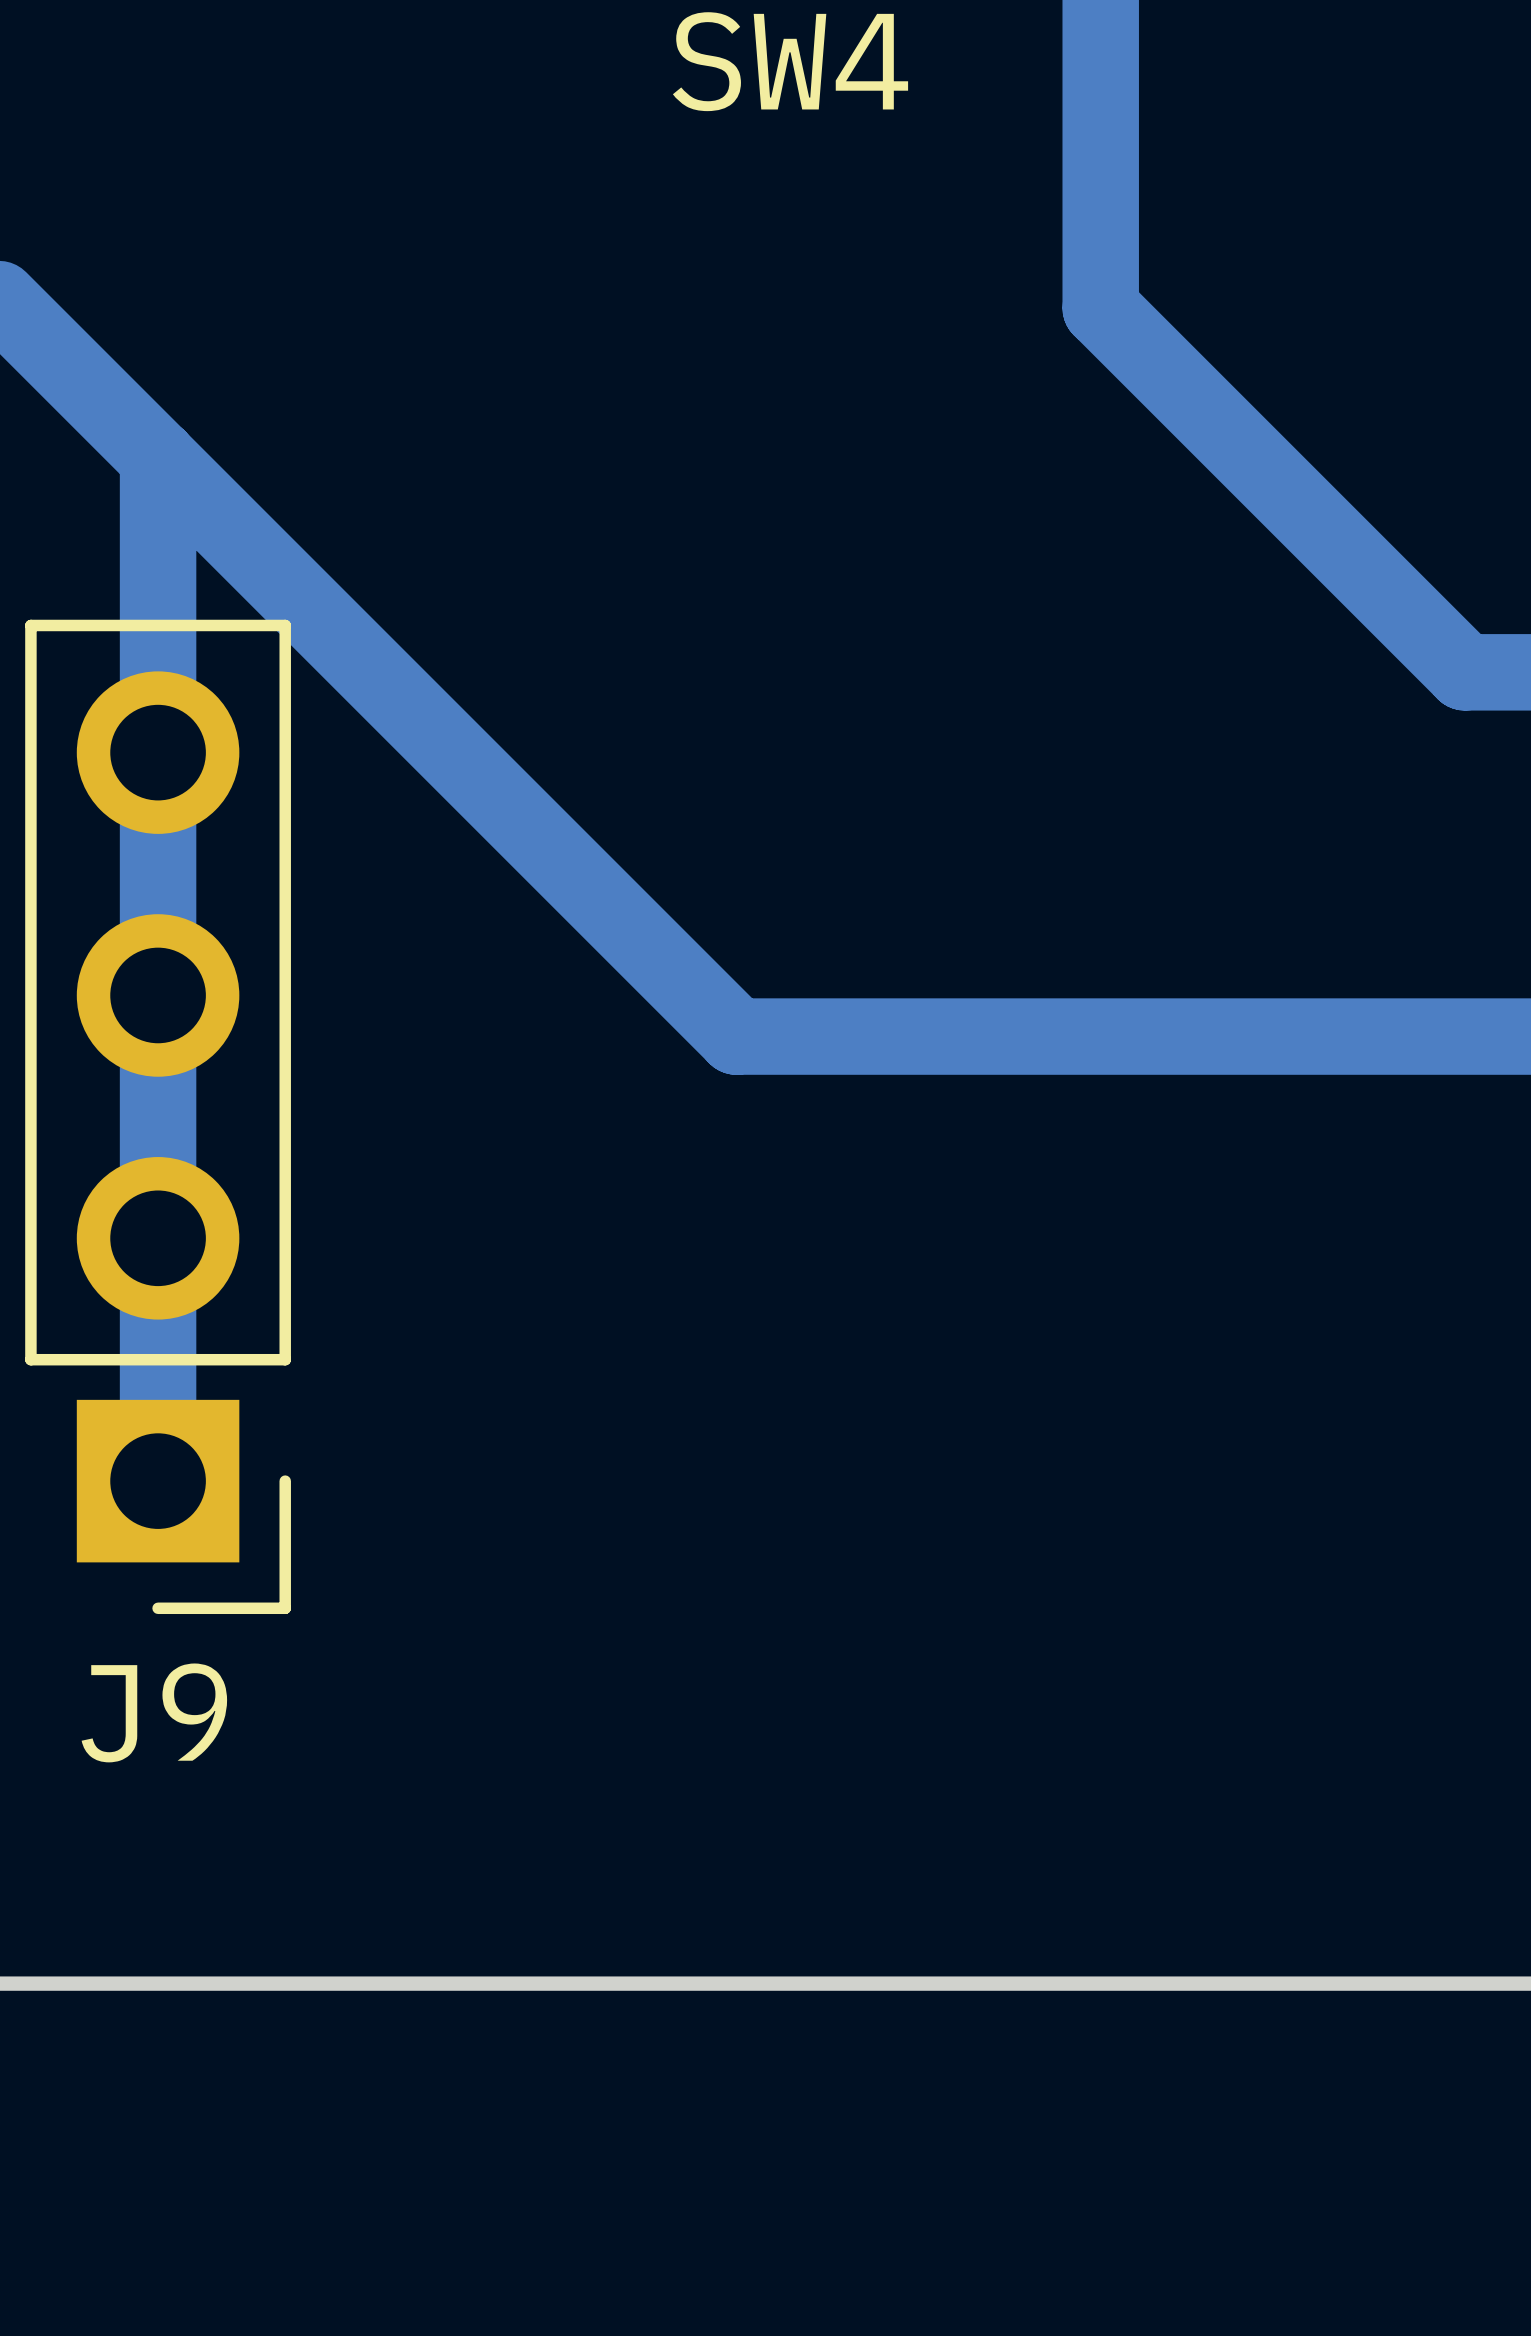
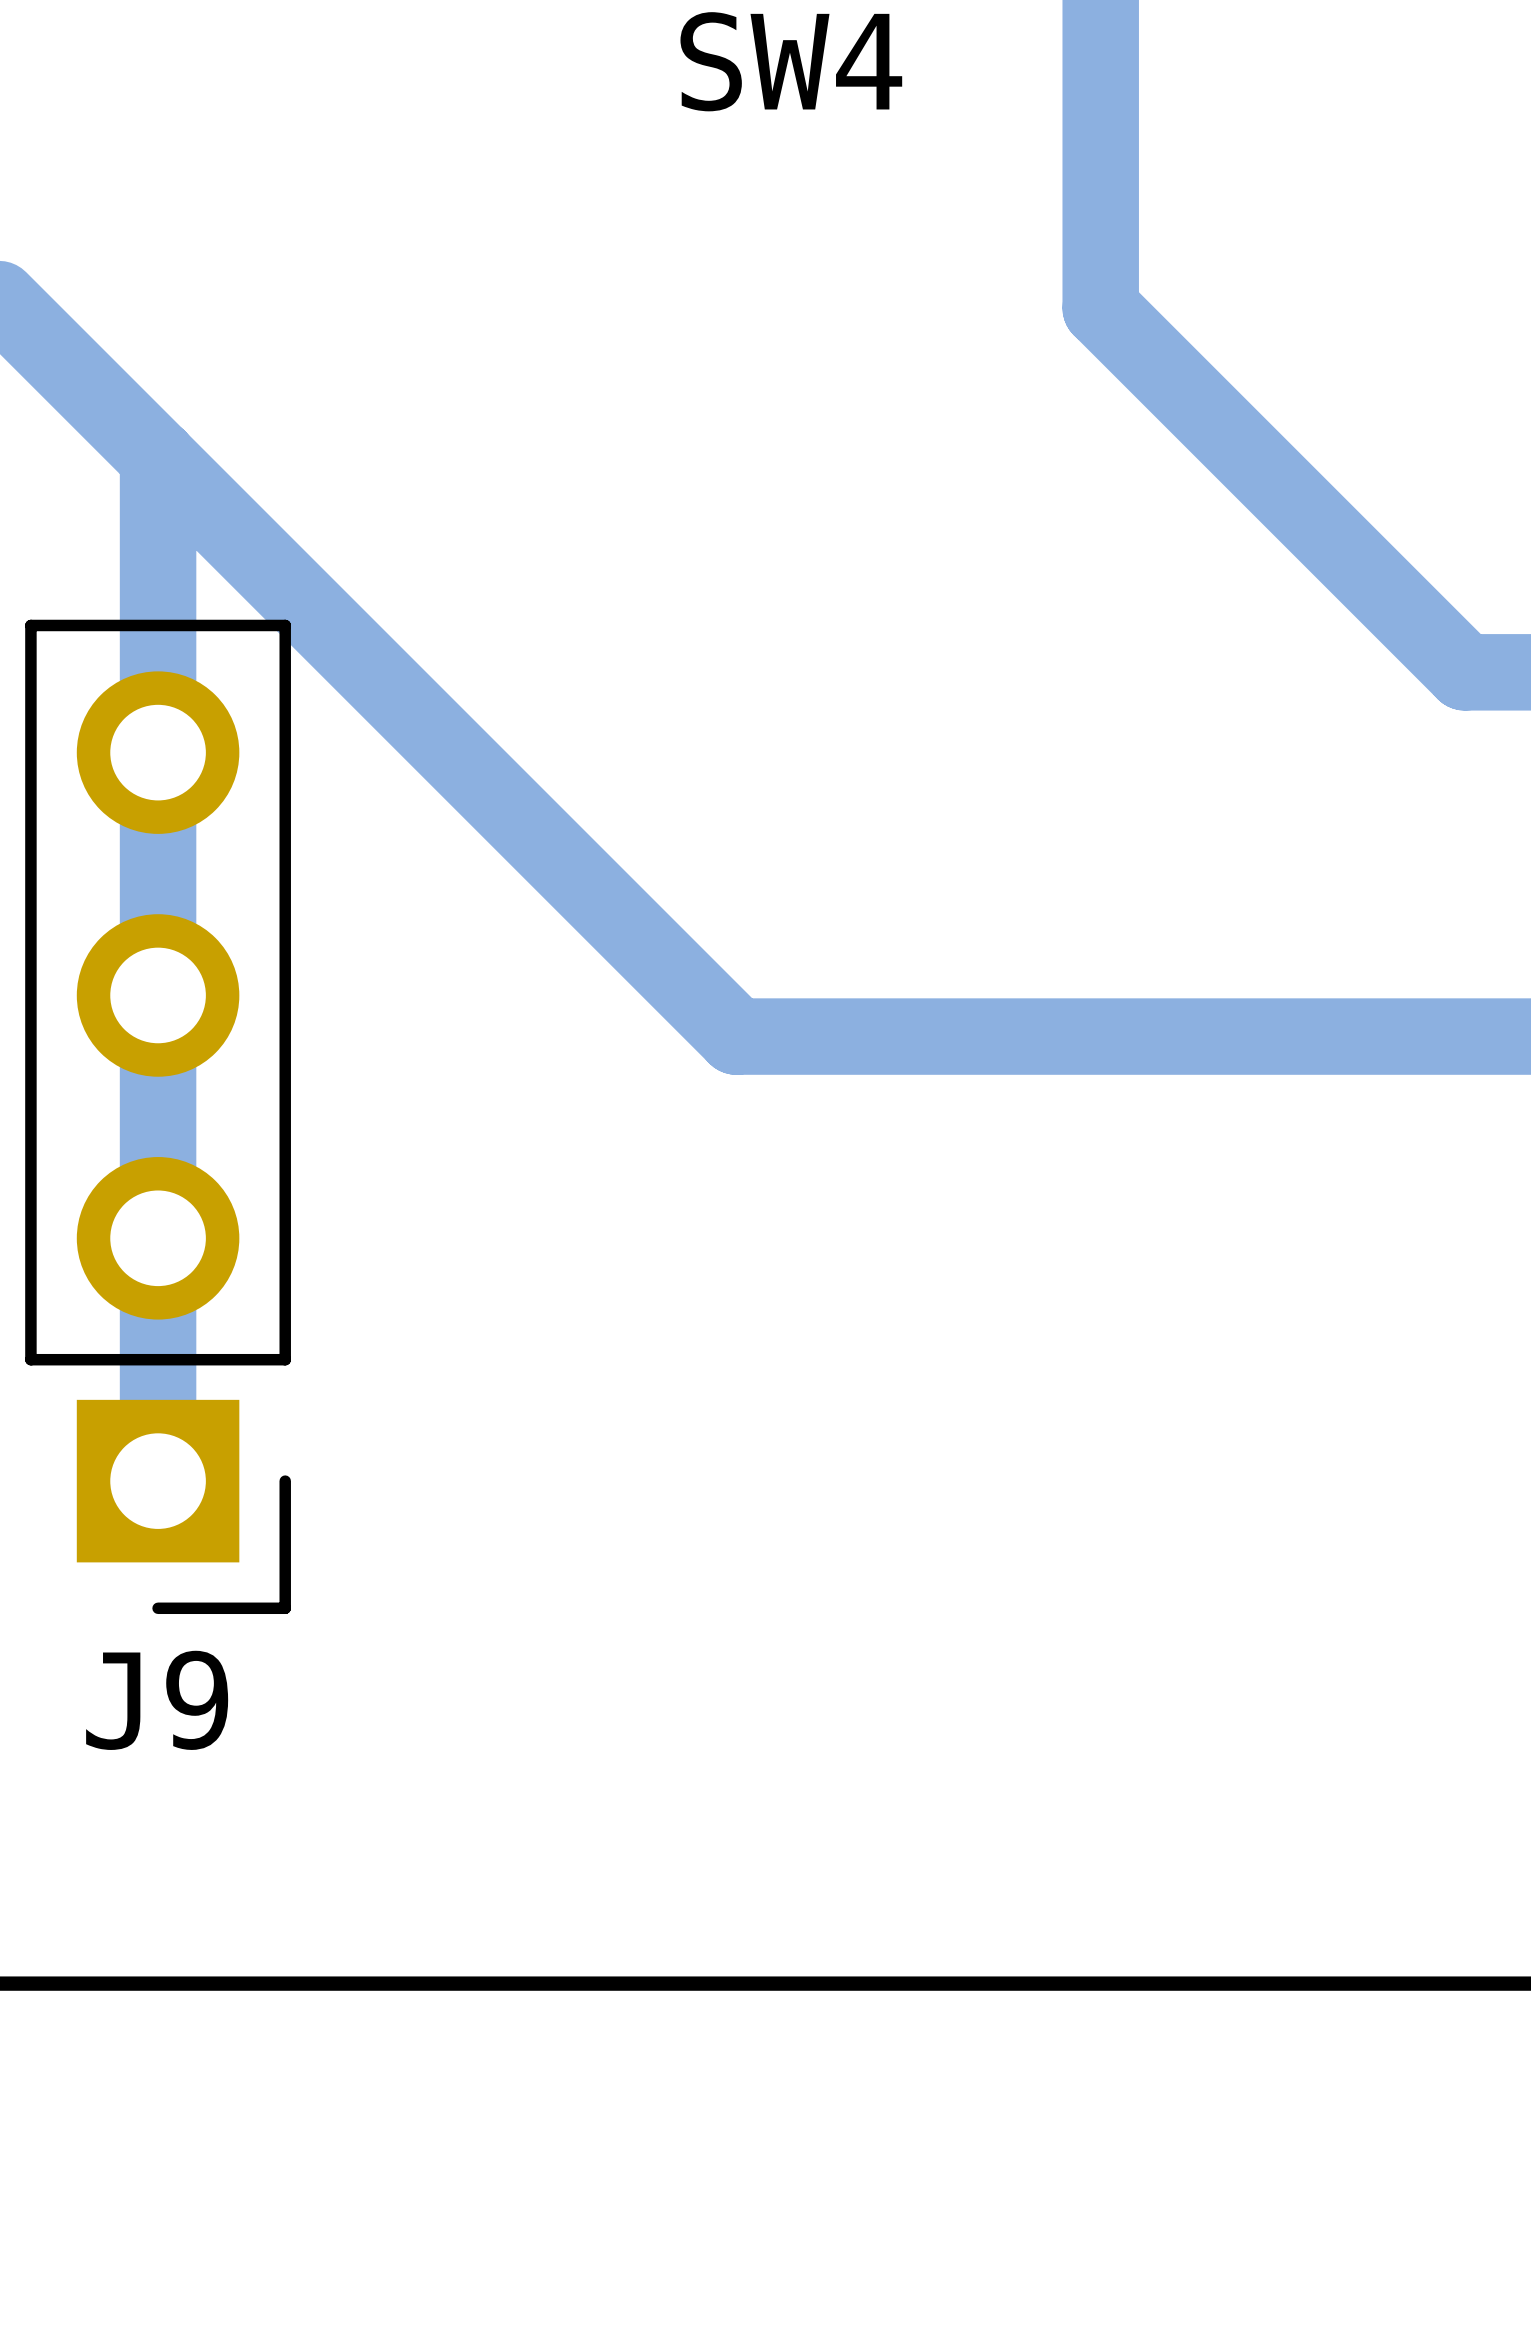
J9 name position: J9 (154, 1712) -> J9 (157, 1700)

